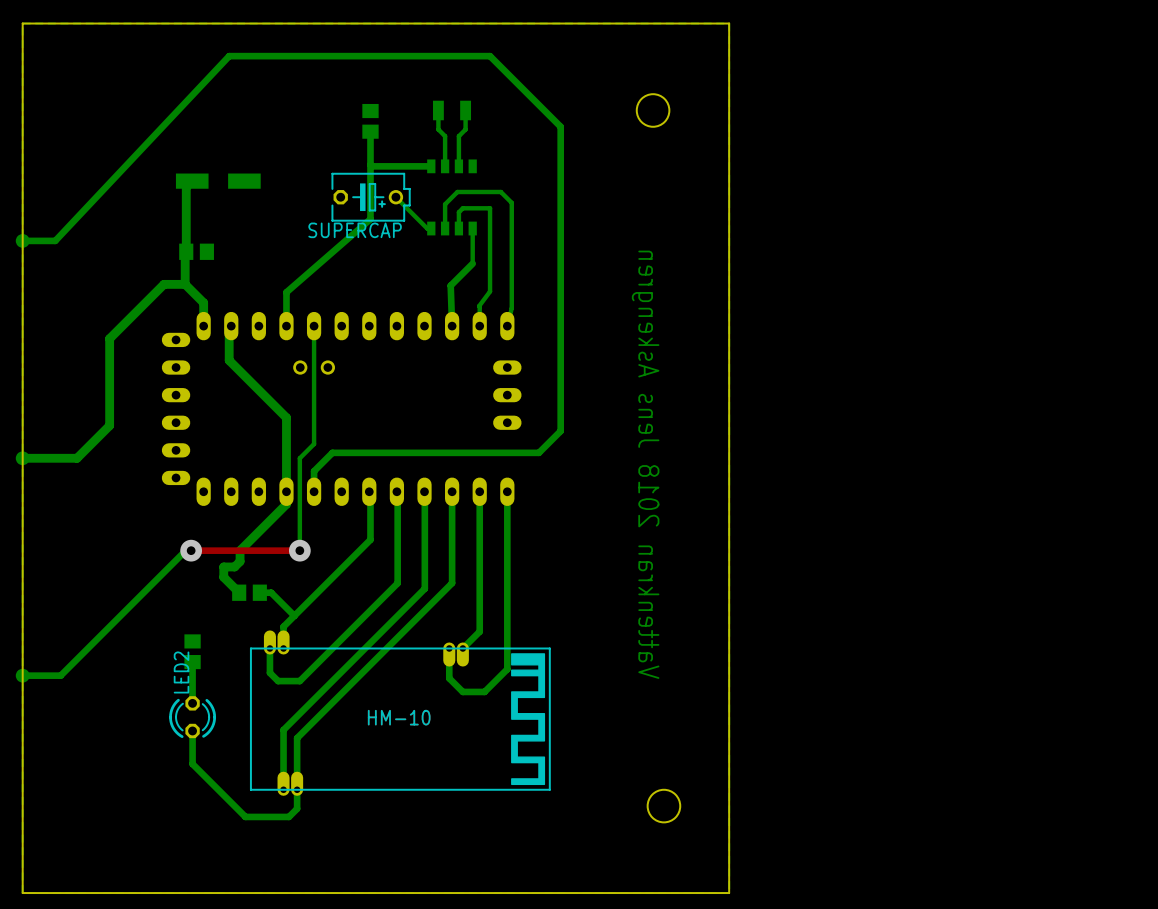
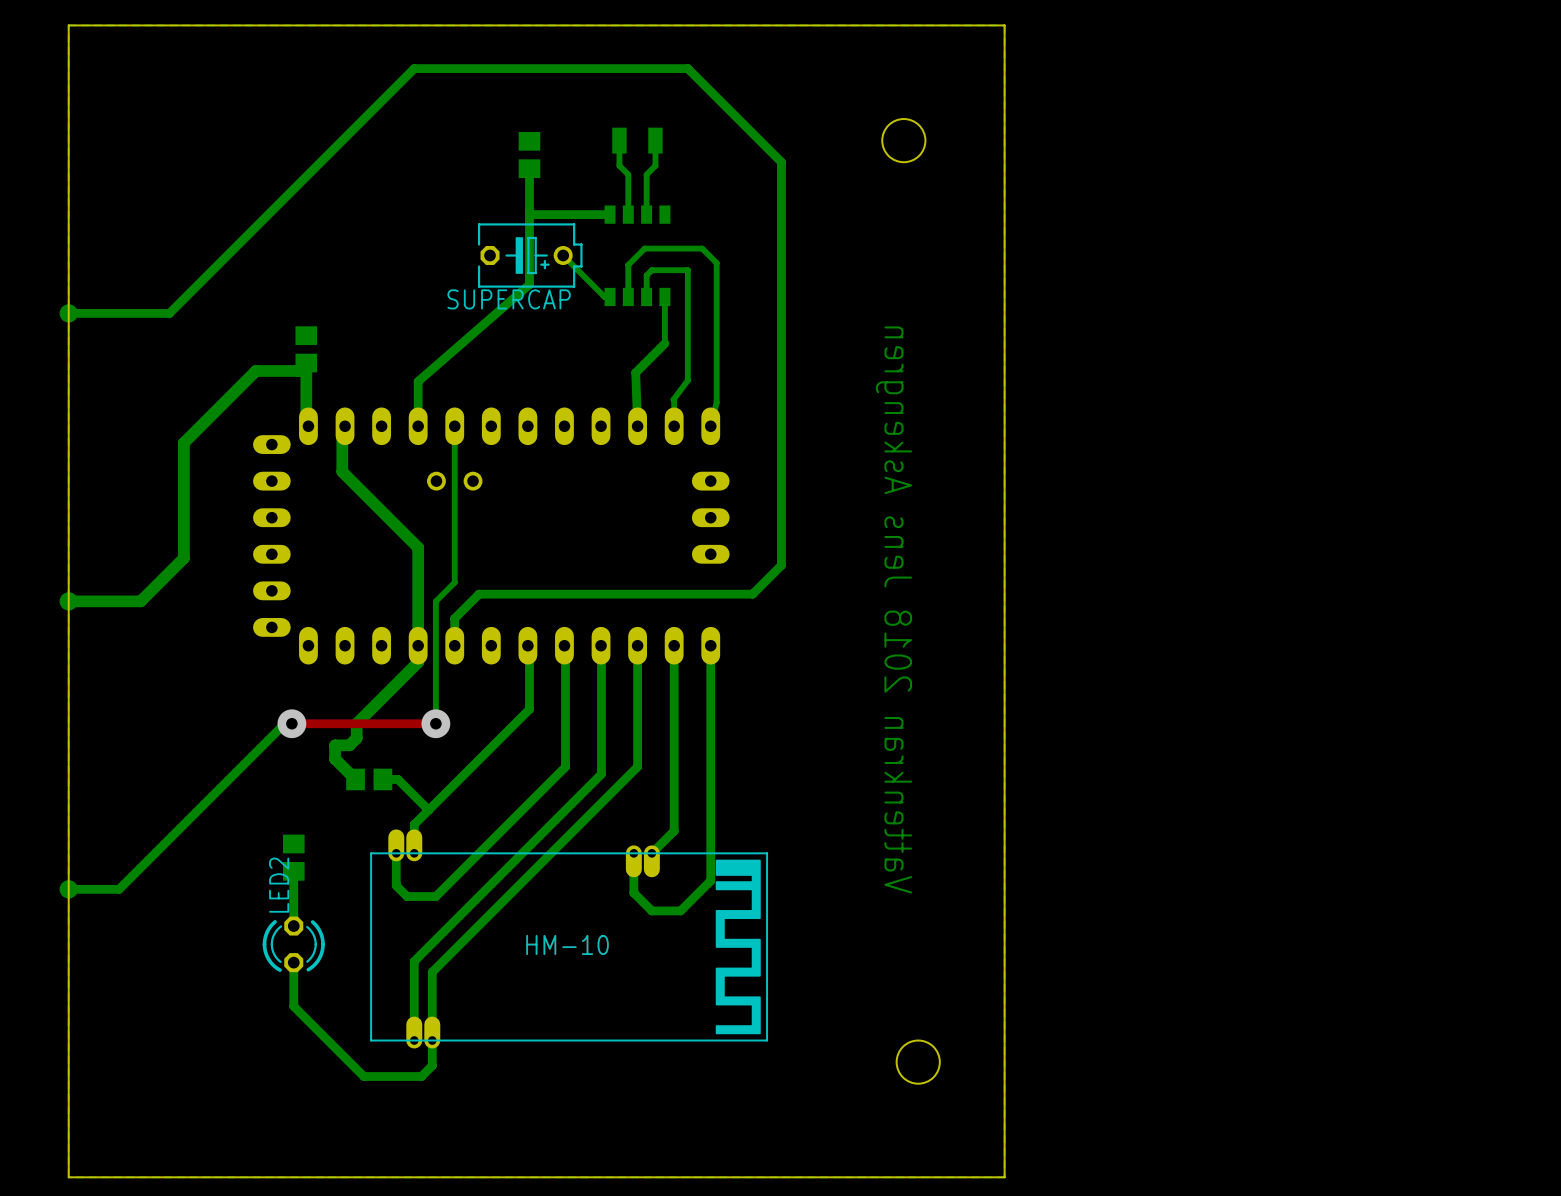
bottom track: (283, 56) (229, 56) (55, 240) -> (414, 68) (169, 313) (111, 313)
bottom track: (192, 181) (186, 187) (185, 284) (203, 302) (203, 326) -> none
part: (218, 181) -> none
part rotation: 0° (196, 251) -> 90° clockwise (306, 349)
bottom track: none -> (283, 370) (298, 370) (306, 363) (306, 424)

